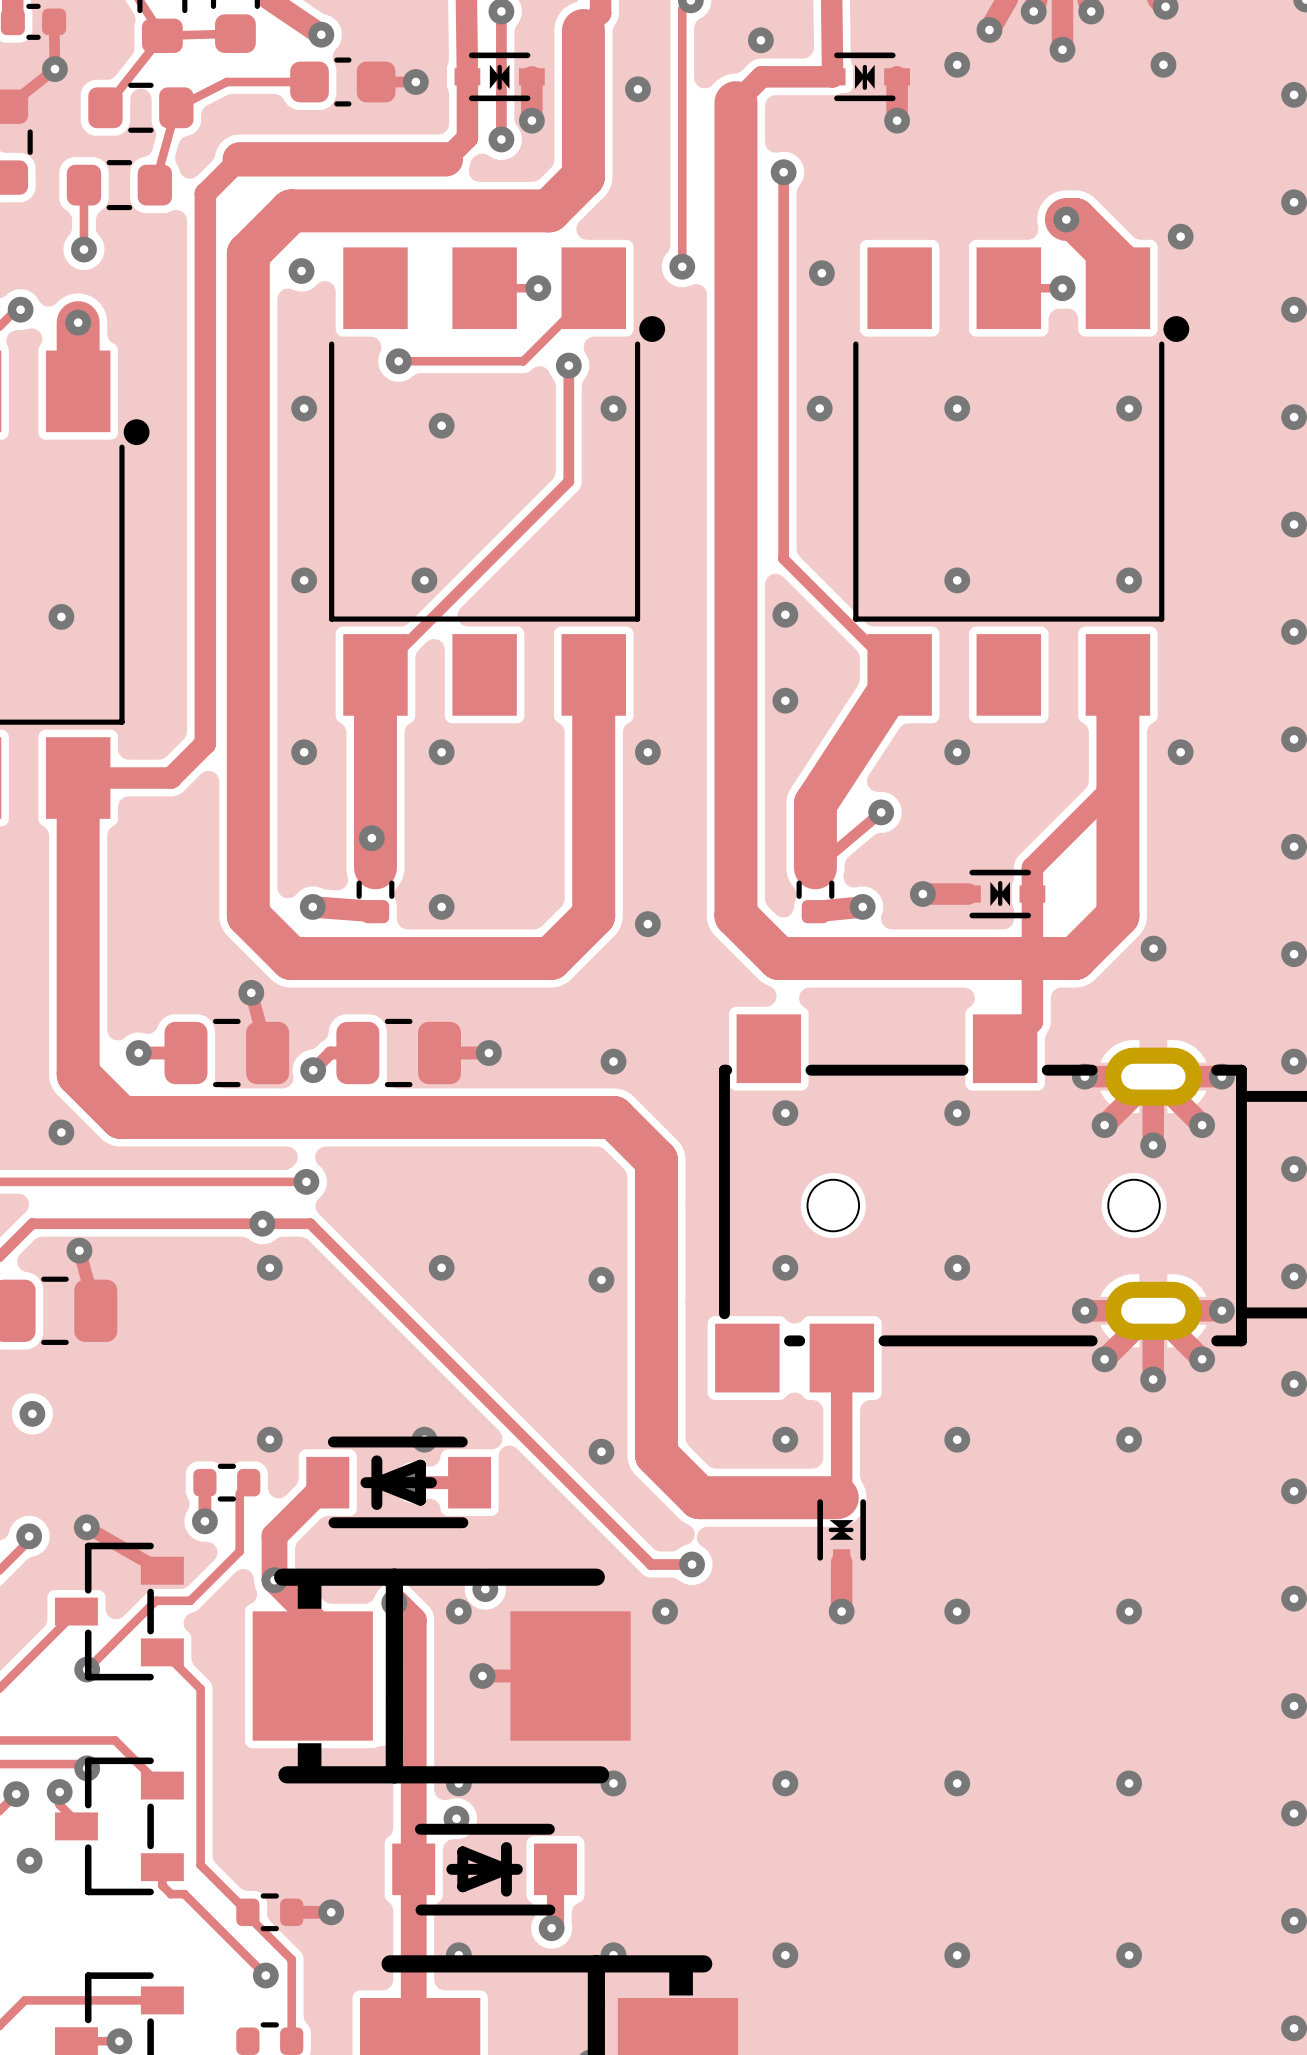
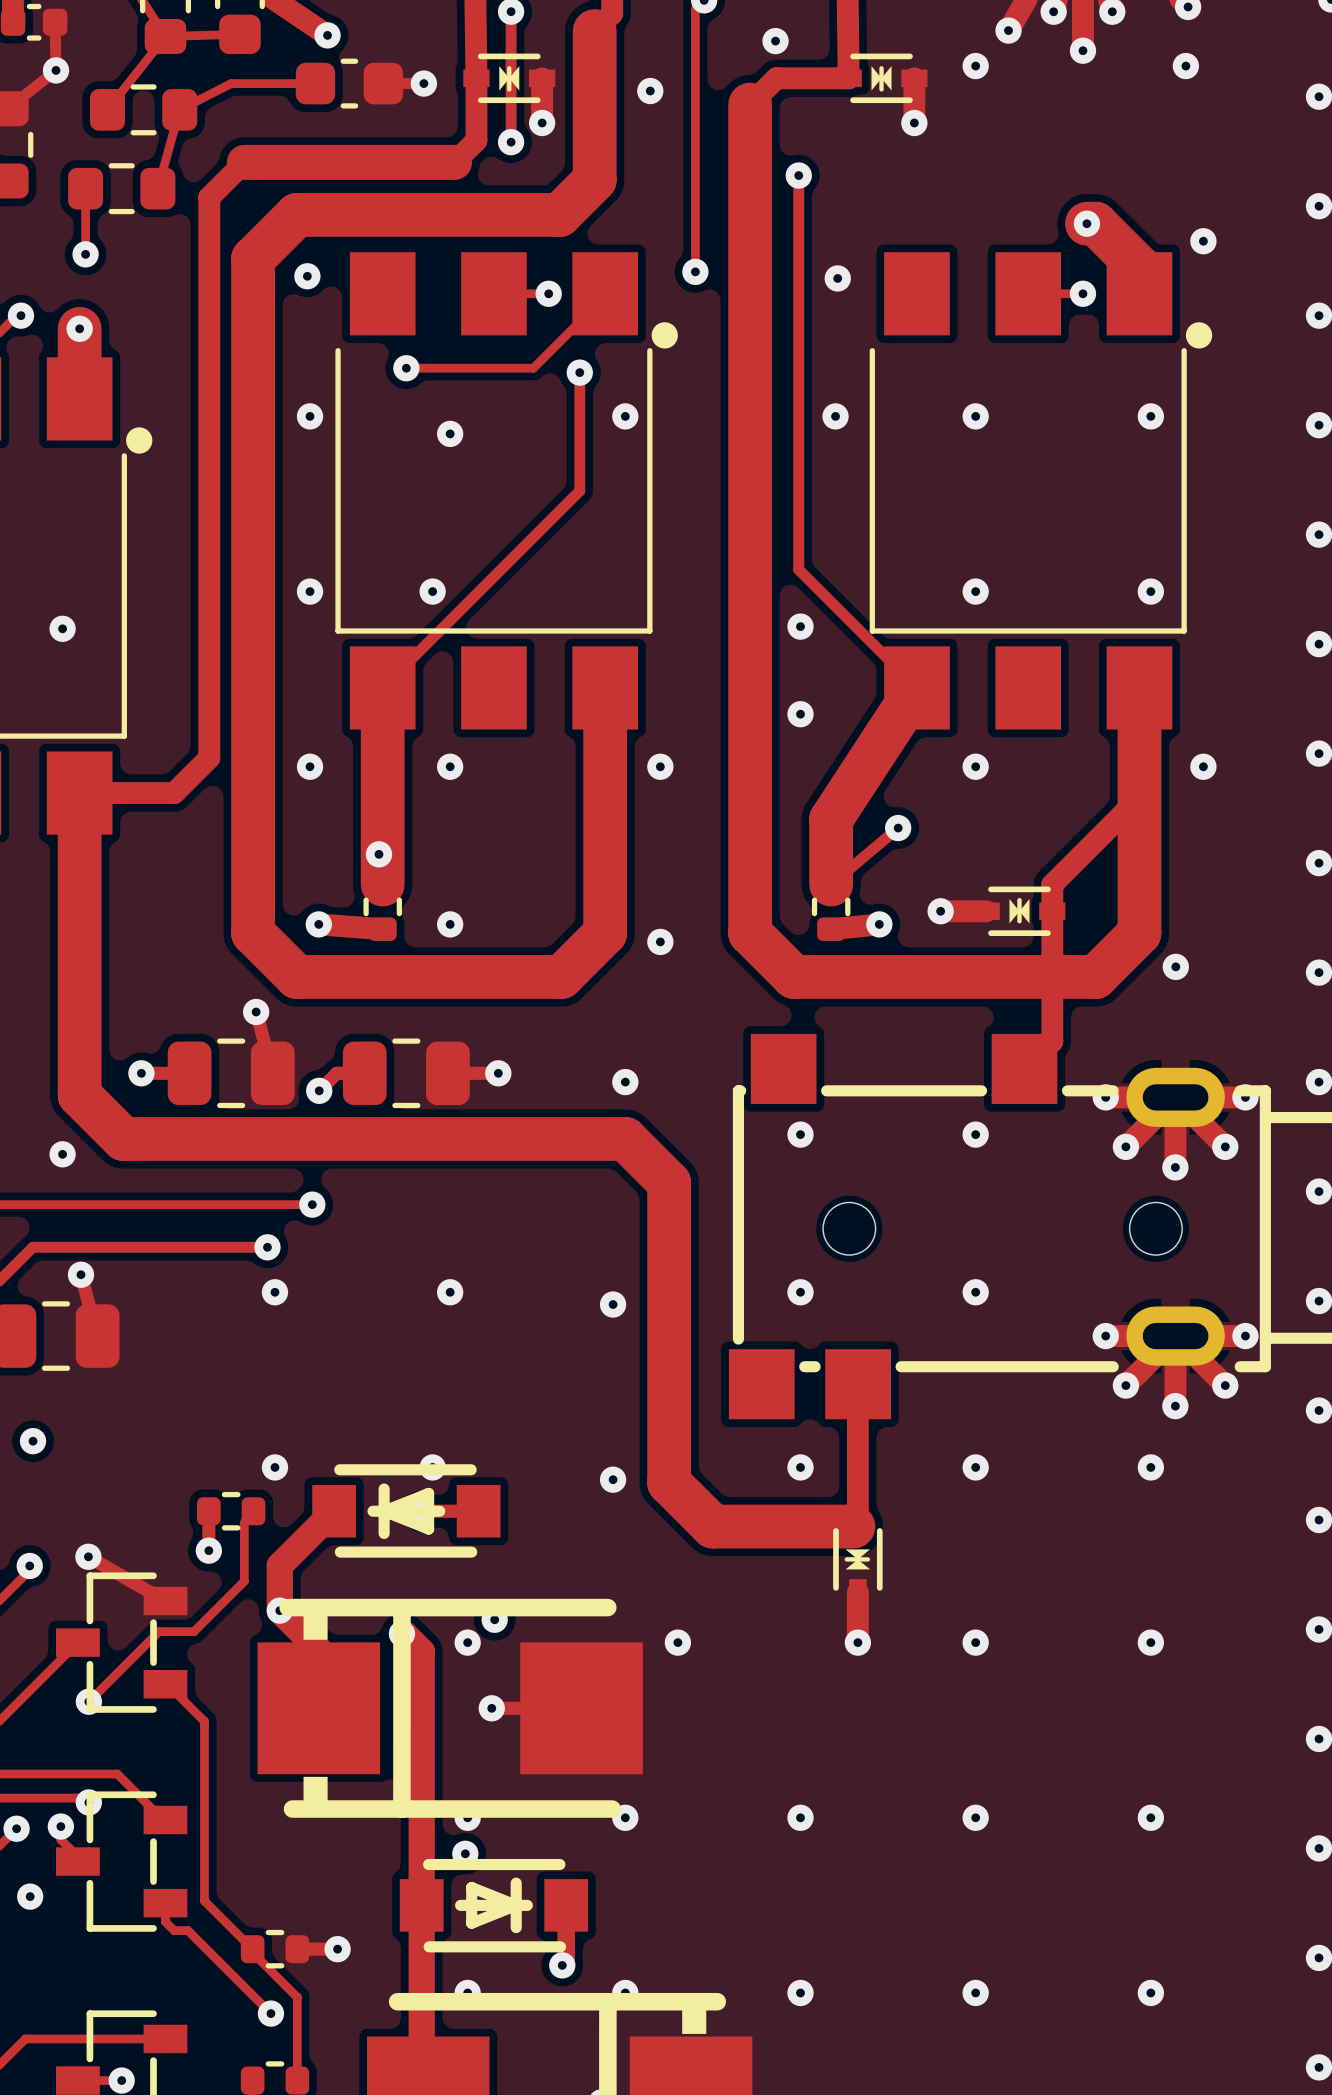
track: (262, 1223) (310, 1223) (651, 1564) (692, 1564) -> none
via: (692, 1564) -> none

